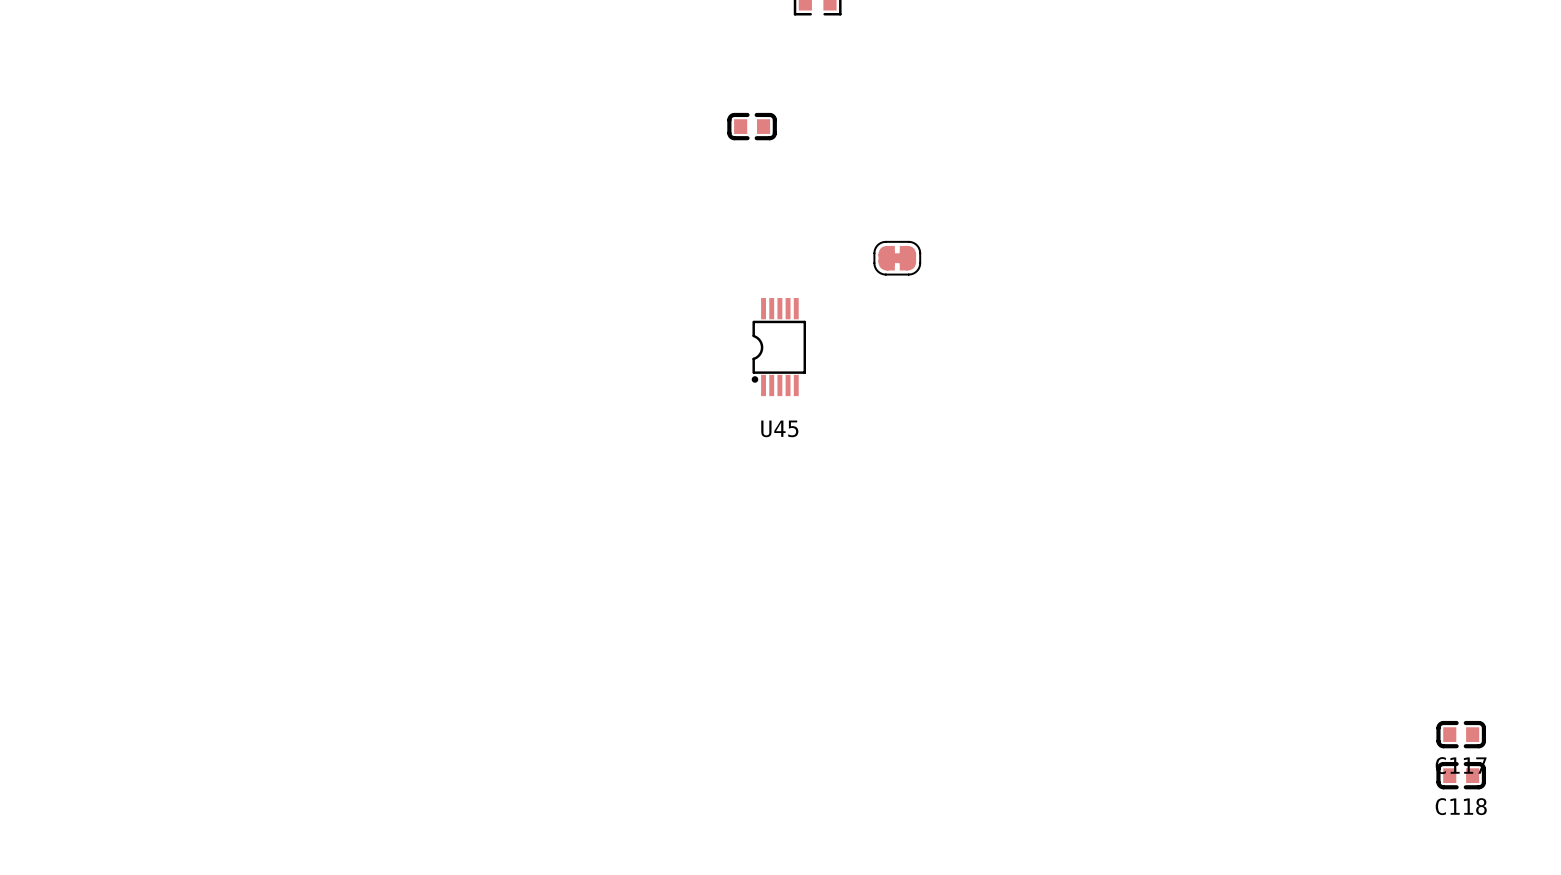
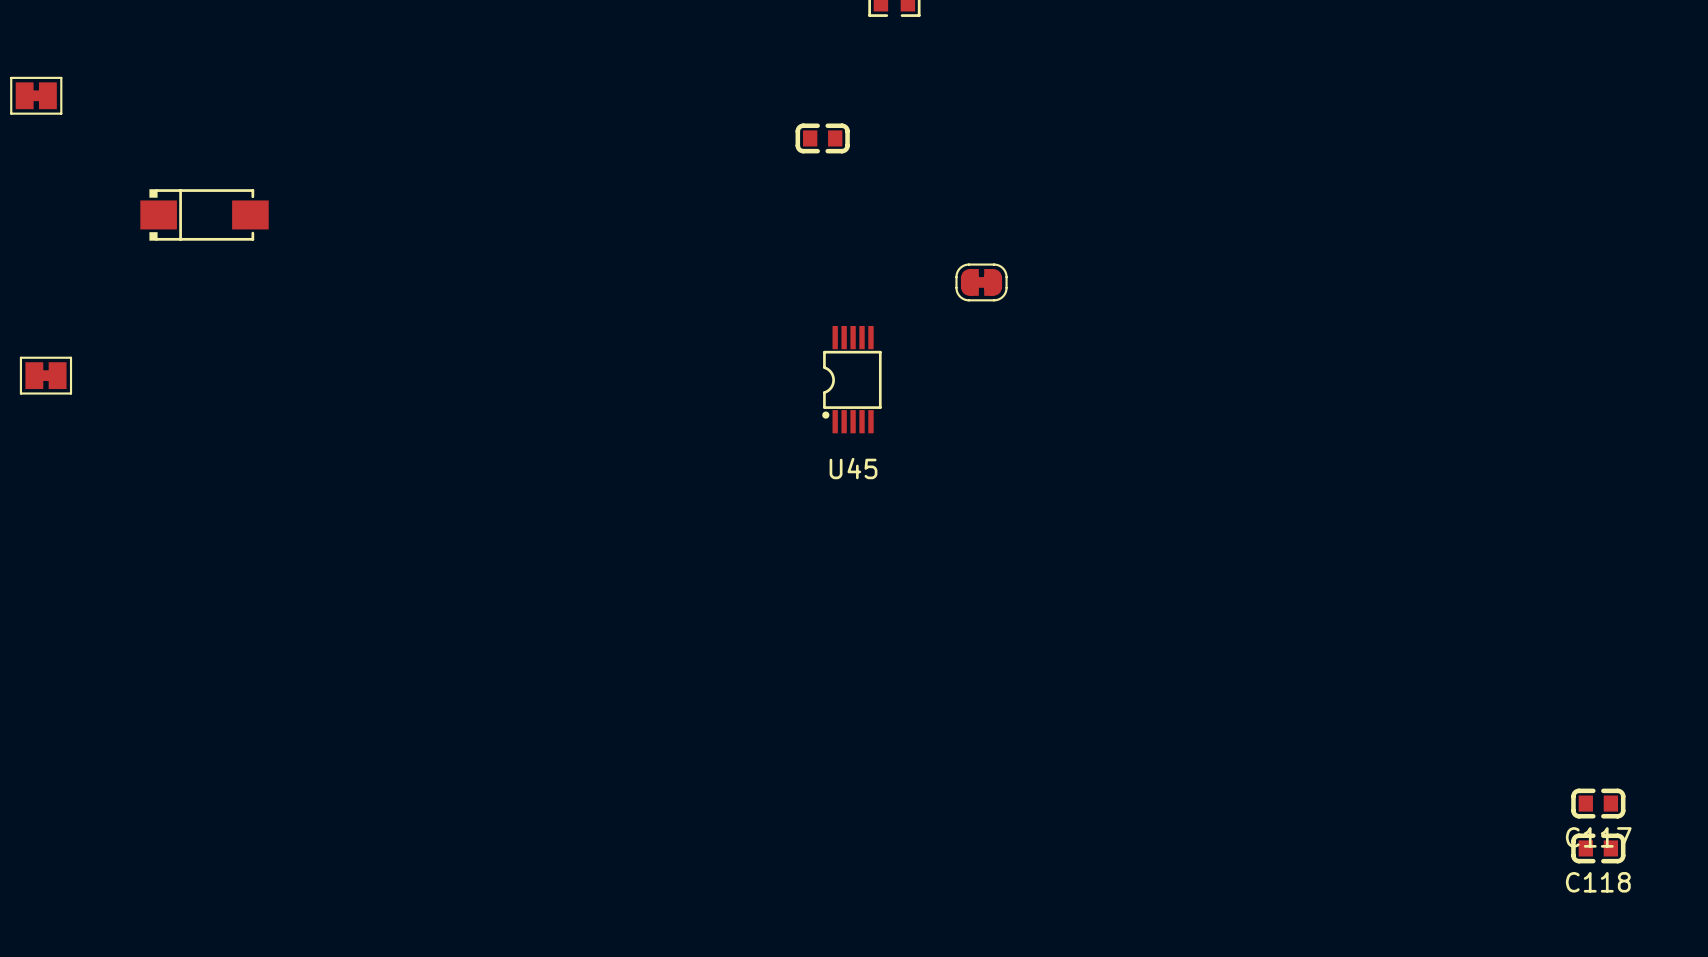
part: none -> (36, 95)
part: none -> (204, 214)
part: none -> (45, 375)

